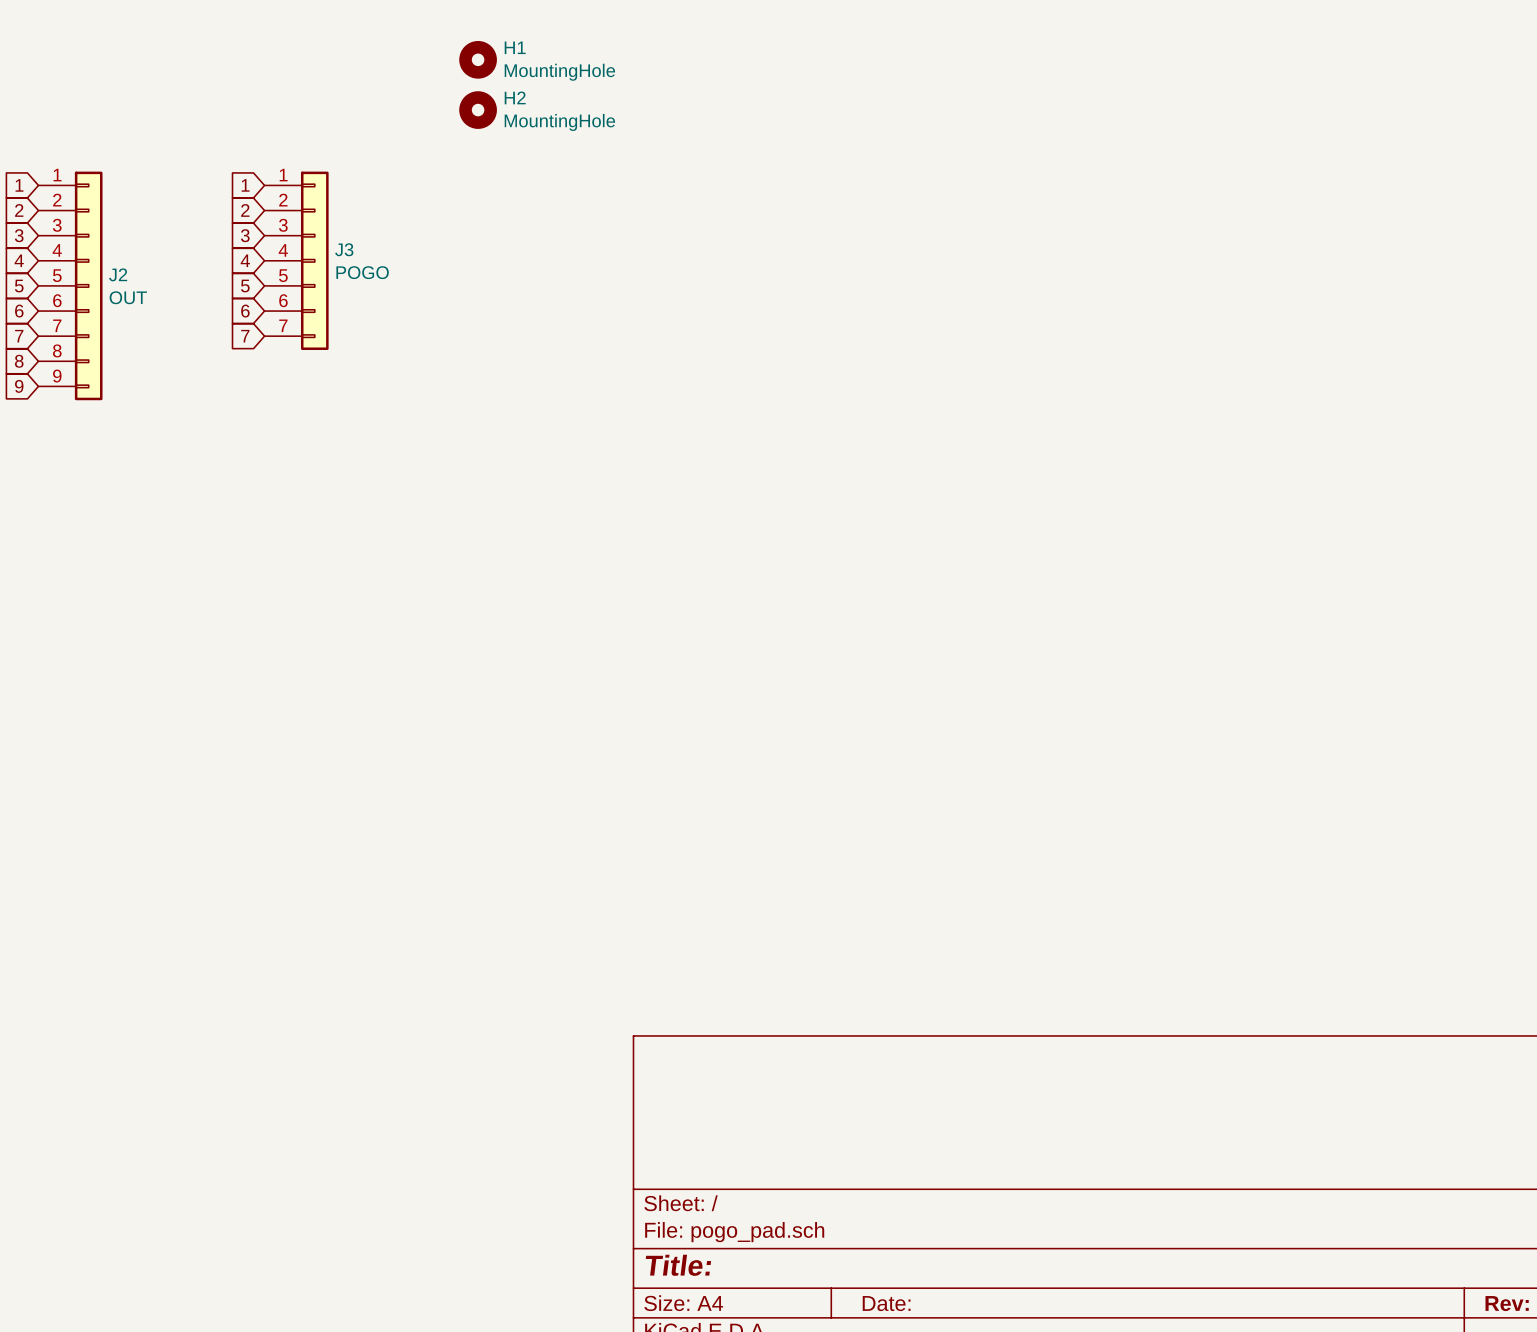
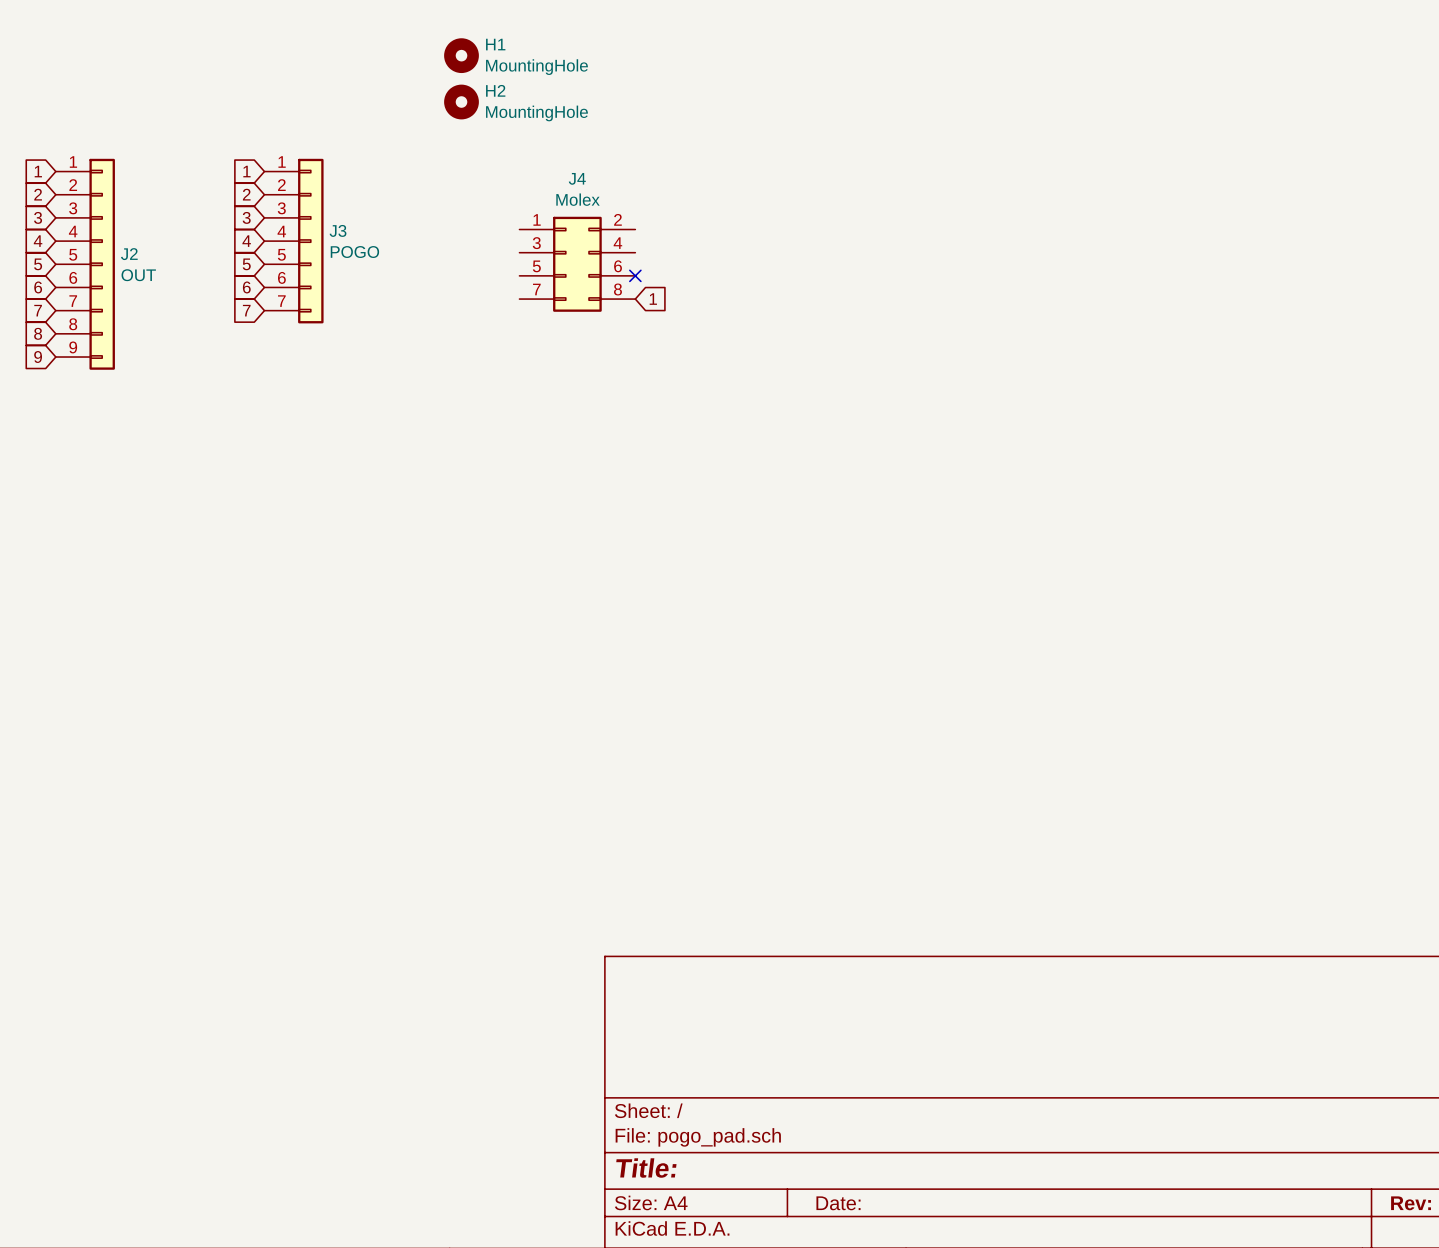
J4: none -> Molex (577, 264)
no-connect mark: none -> (635, 275)
global label: none -> 1 (653, 299)

